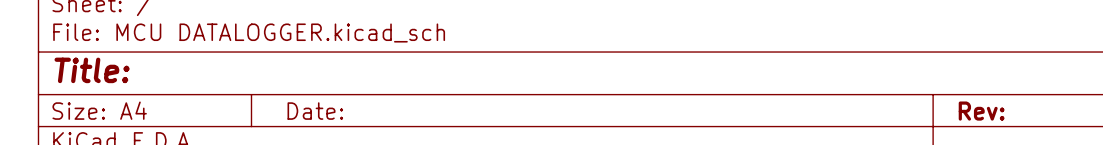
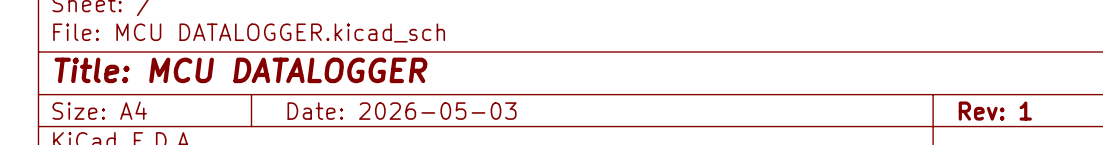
title block: Title: (92, 70) -> Title: MCU DATALOGGER (240, 70)
title block: Date: (315, 111) -> Date: 2026-05-03 (402, 111)
title block: Rev: (981, 111) -> Rev: 1 (995, 111)

